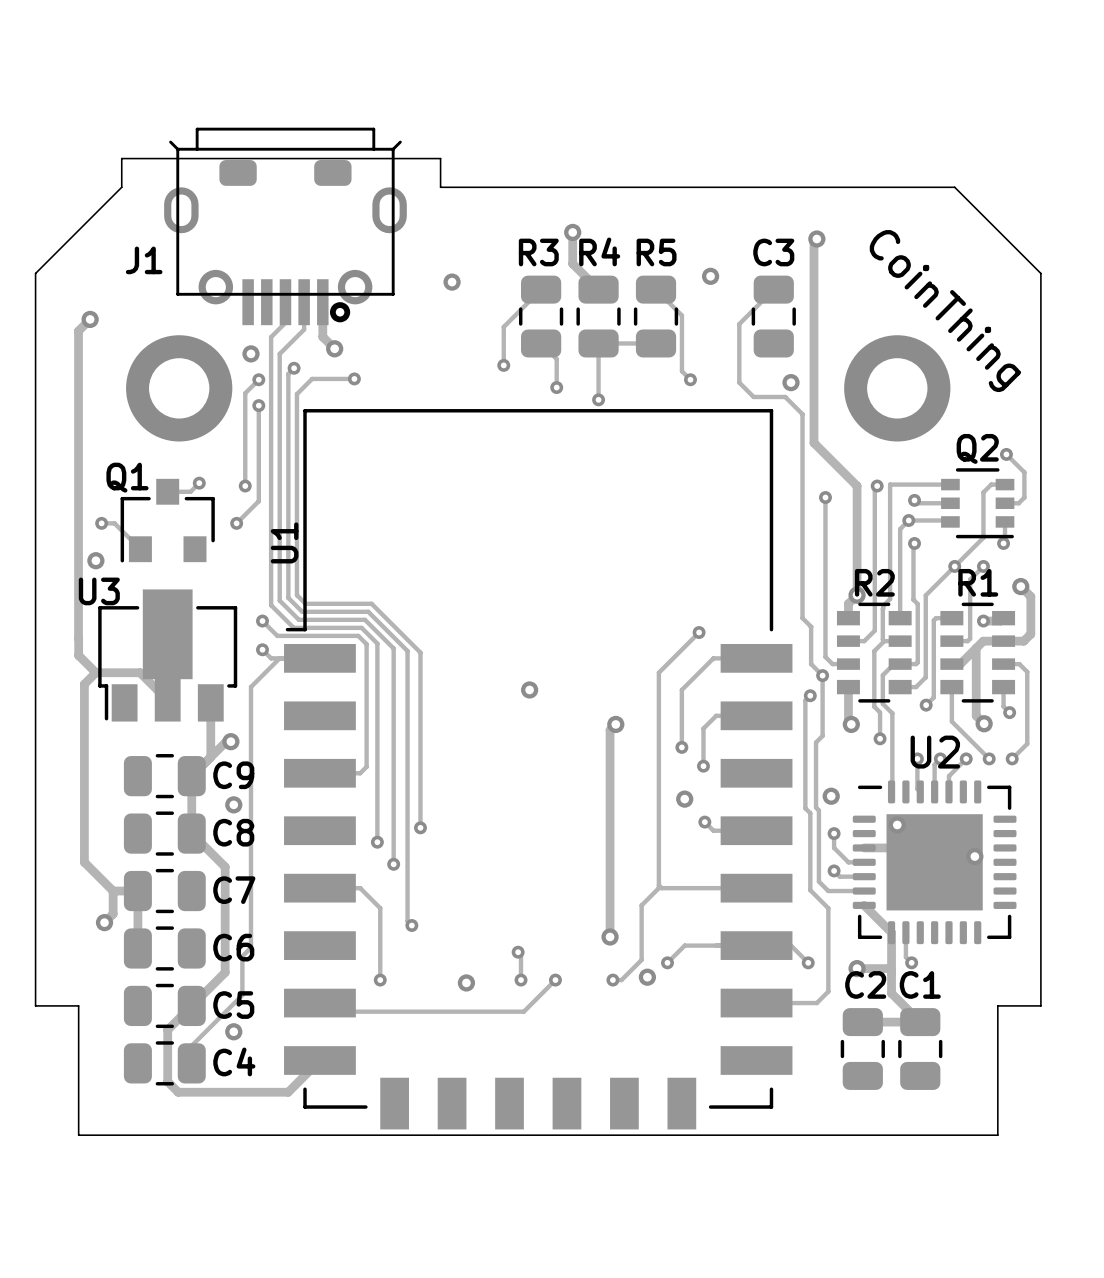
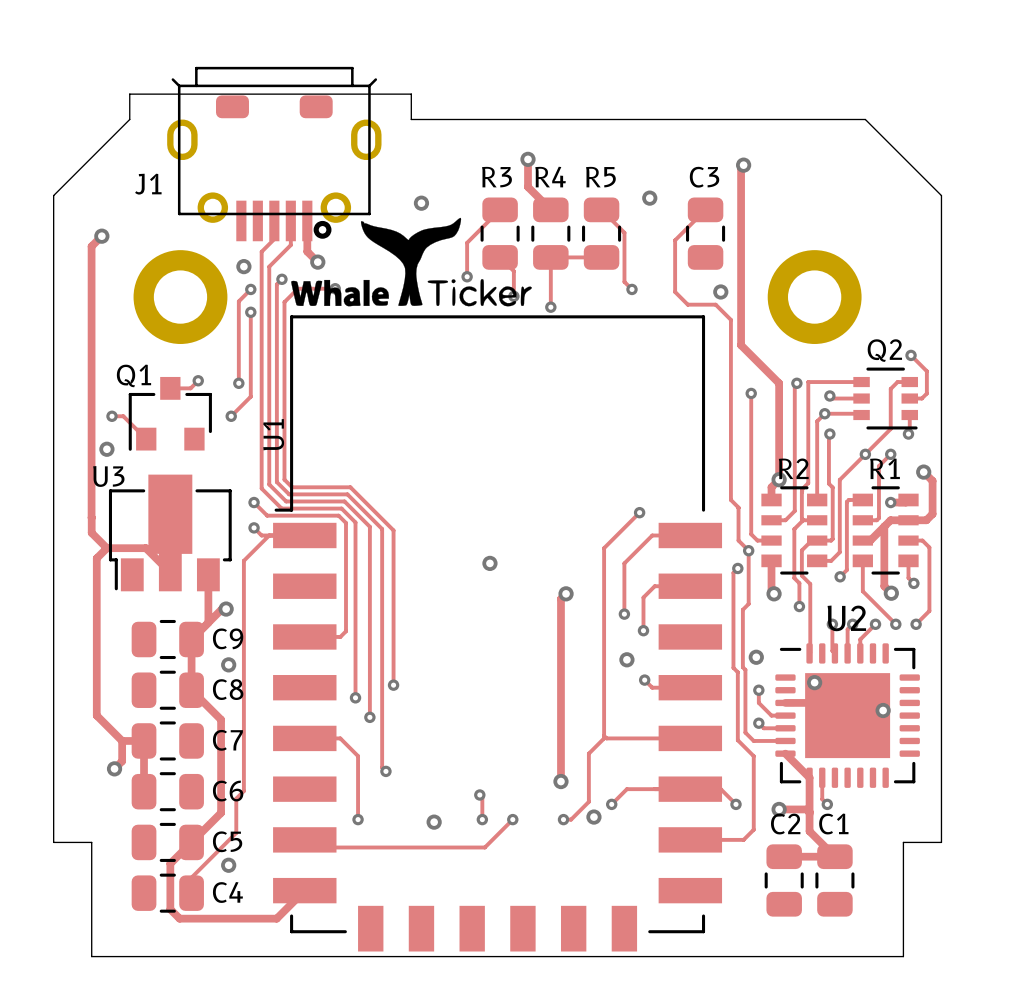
drawing: none -> [291, 217, 532, 307]
text: CoinThing (945, 311) -> none

